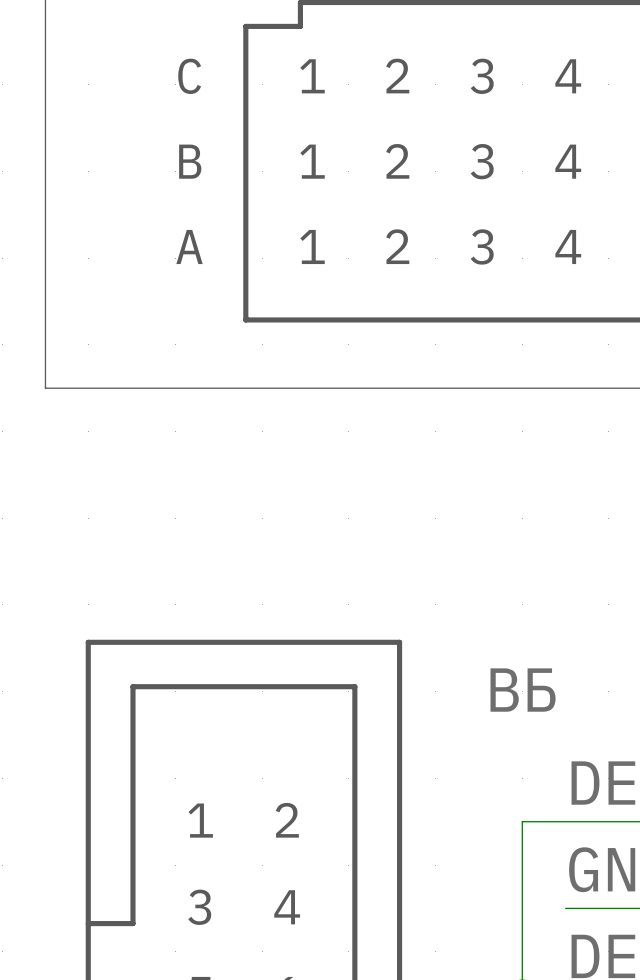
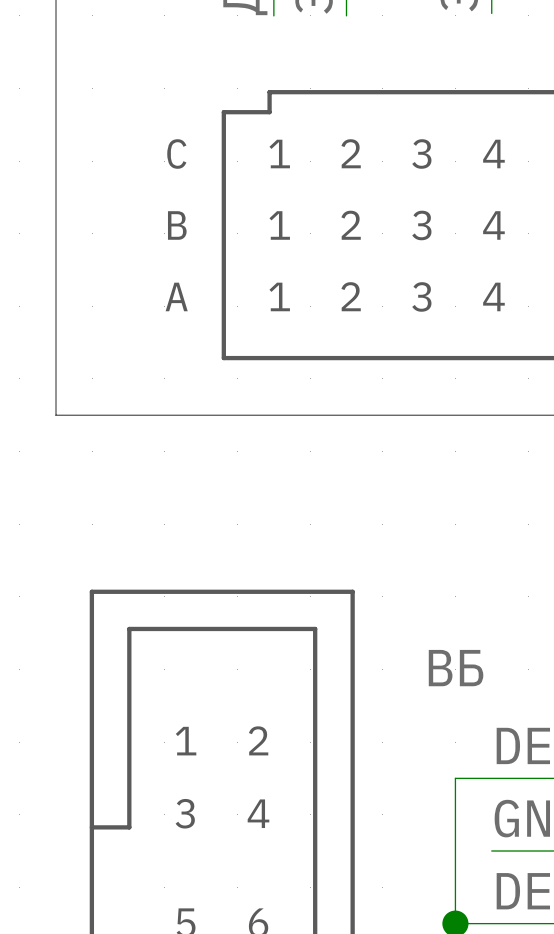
line: (88, 642) (399, 642) -> (91, 628) (91, 591) (352, 591) (352, 628)
line: (132, 686) (354, 686) -> (129, 665) (129, 628) (315, 628) (315, 665)
text position: 1 (200, 820) -> 1 (186, 741)
text position: 2 (287, 820) -> 2 (258, 740)
line: (132, 880) (132, 923) (88, 923) -> (129, 827) (91, 827)
text position: 3 (199, 907) -> 3 (185, 813)
text position: 4 (287, 907) -> 4 (258, 813)

